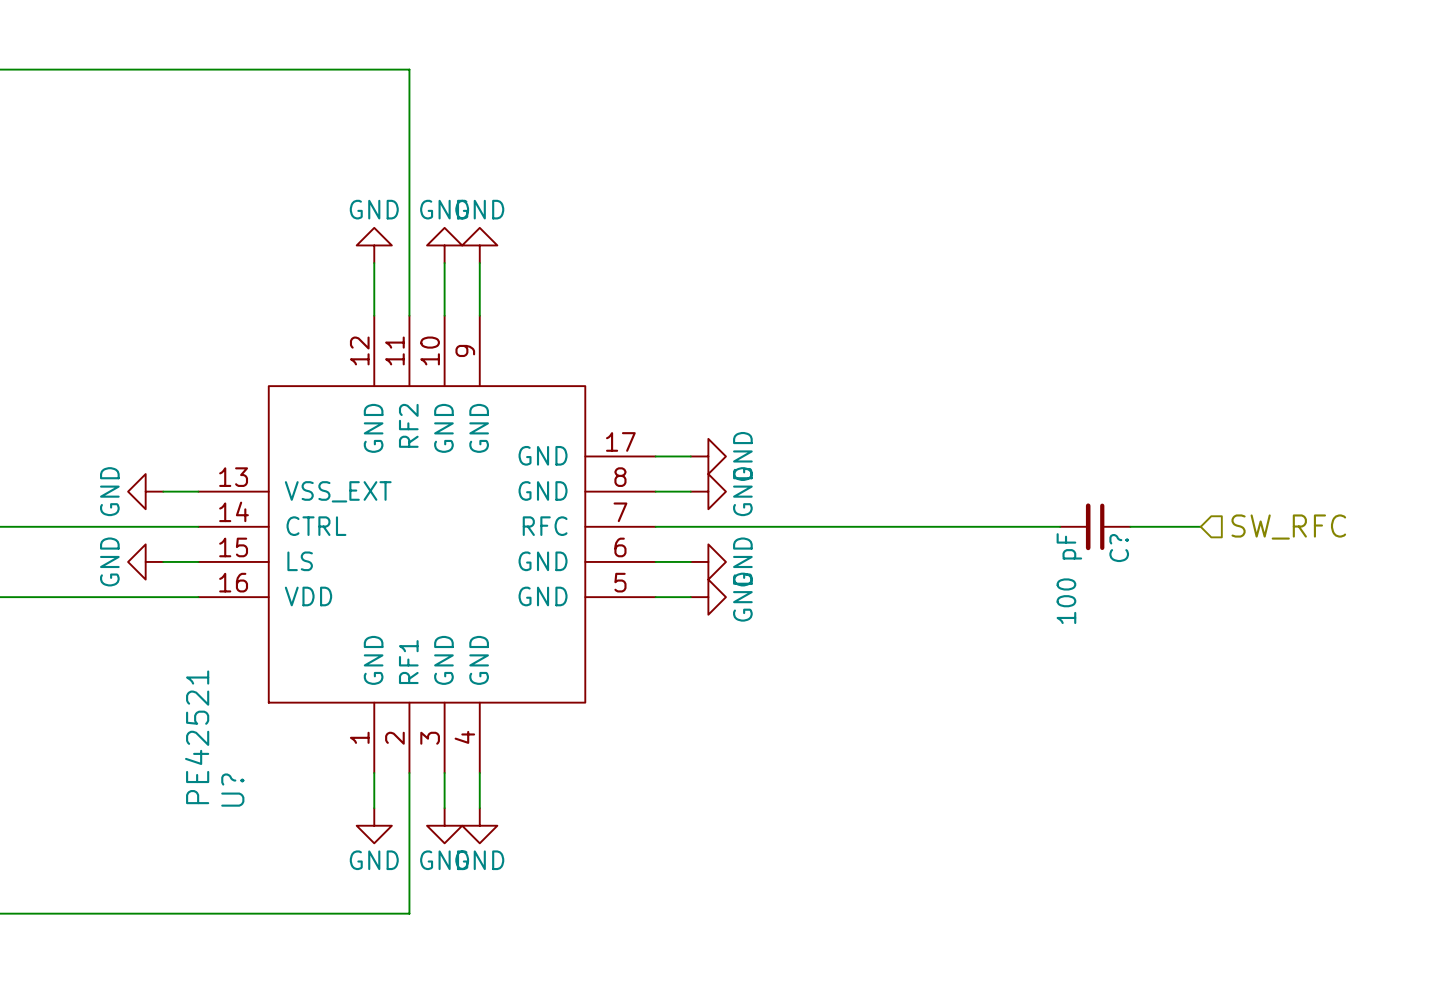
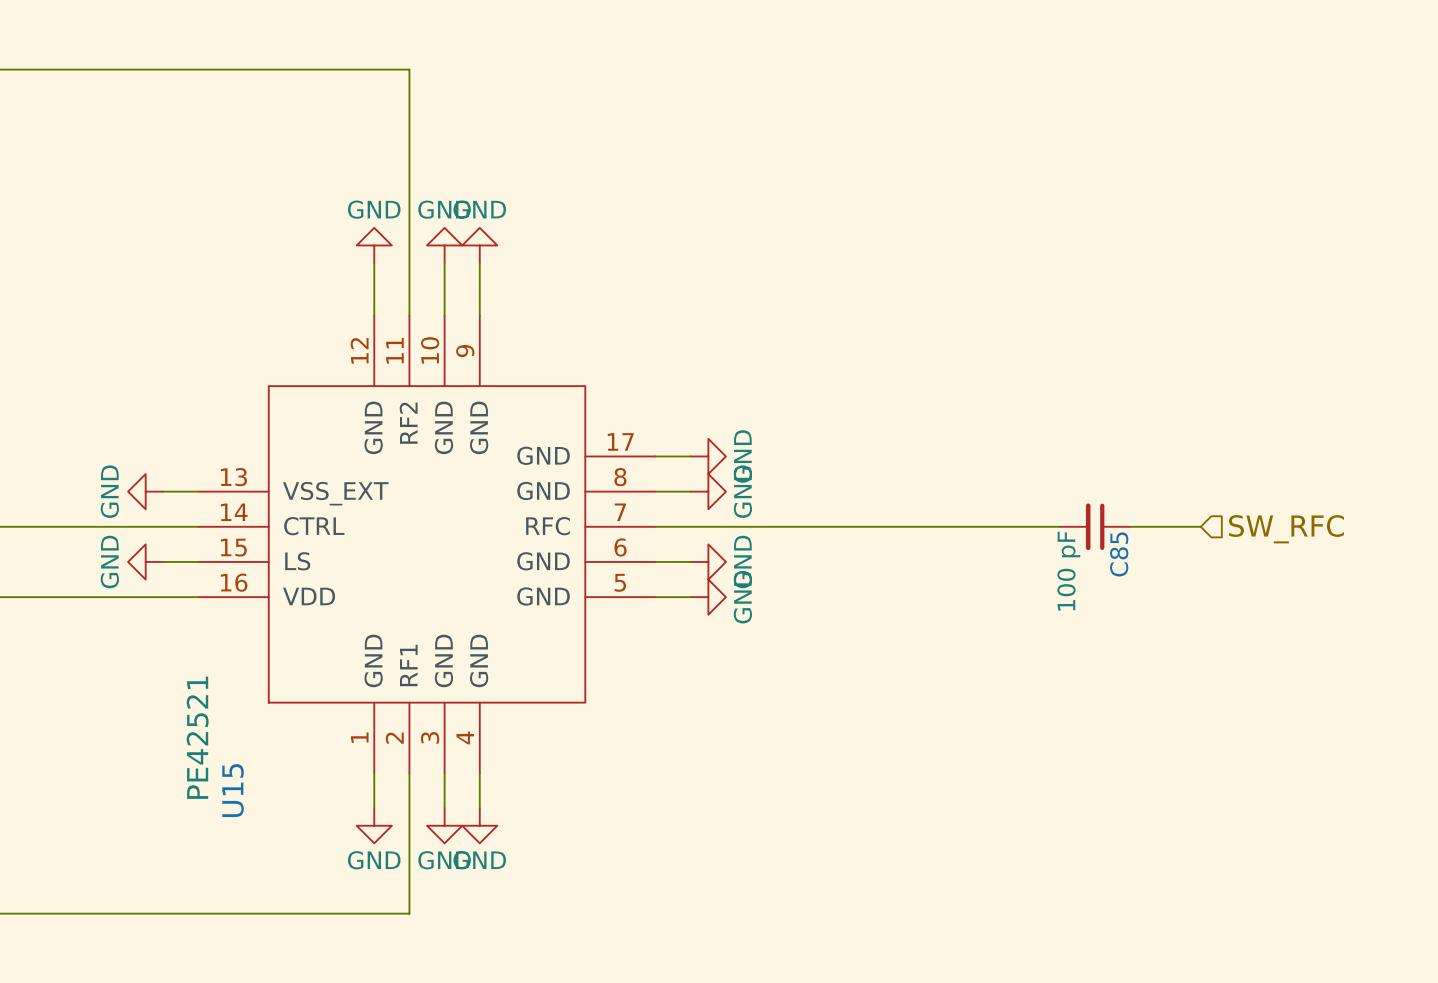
C? name: C? (1119, 548) -> C85 (1119, 554)
U? name: U? (232, 790) -> U15 (233, 790)

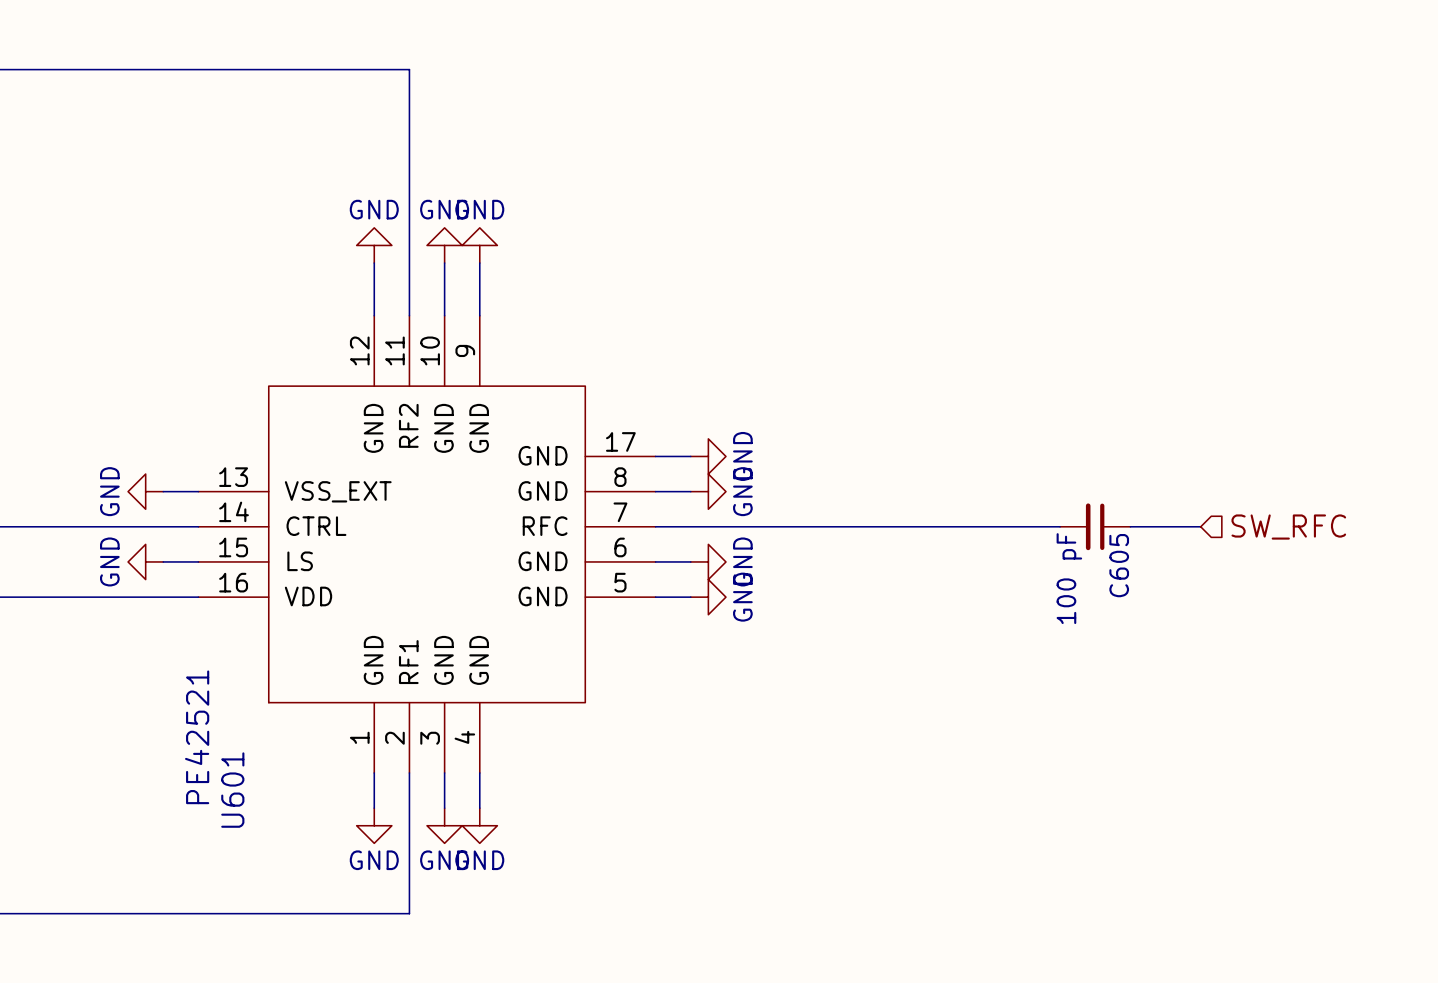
C85 name: C85 (1119, 554) -> C605 (1119, 565)
U15 name: U15 (233, 790) -> U601 (232, 790)

